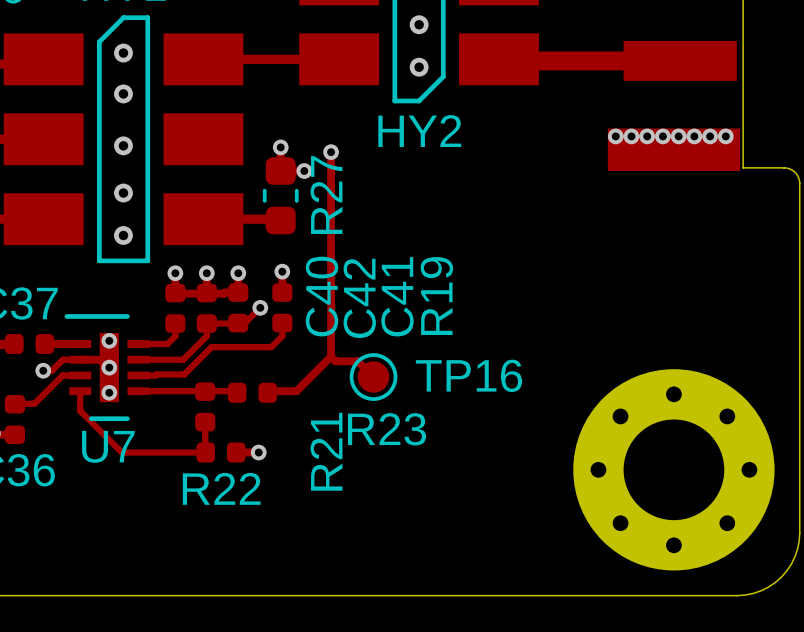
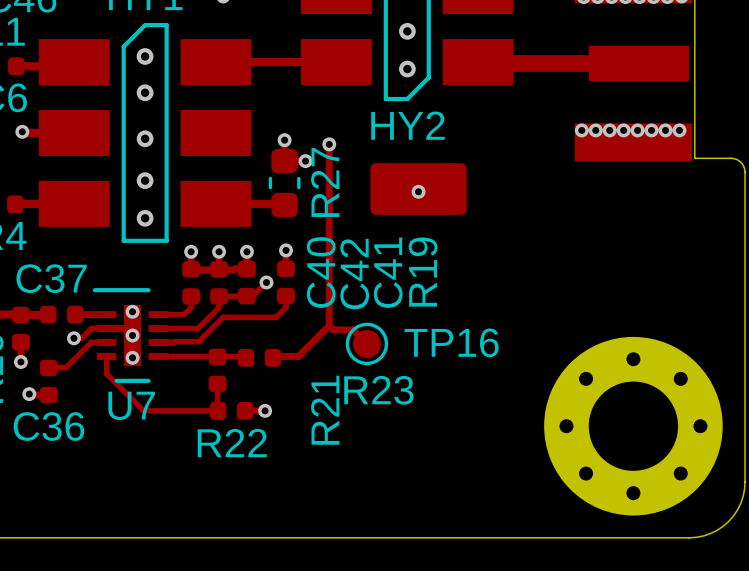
part: none -> (418, 189)
via: none -> (418, 191)

